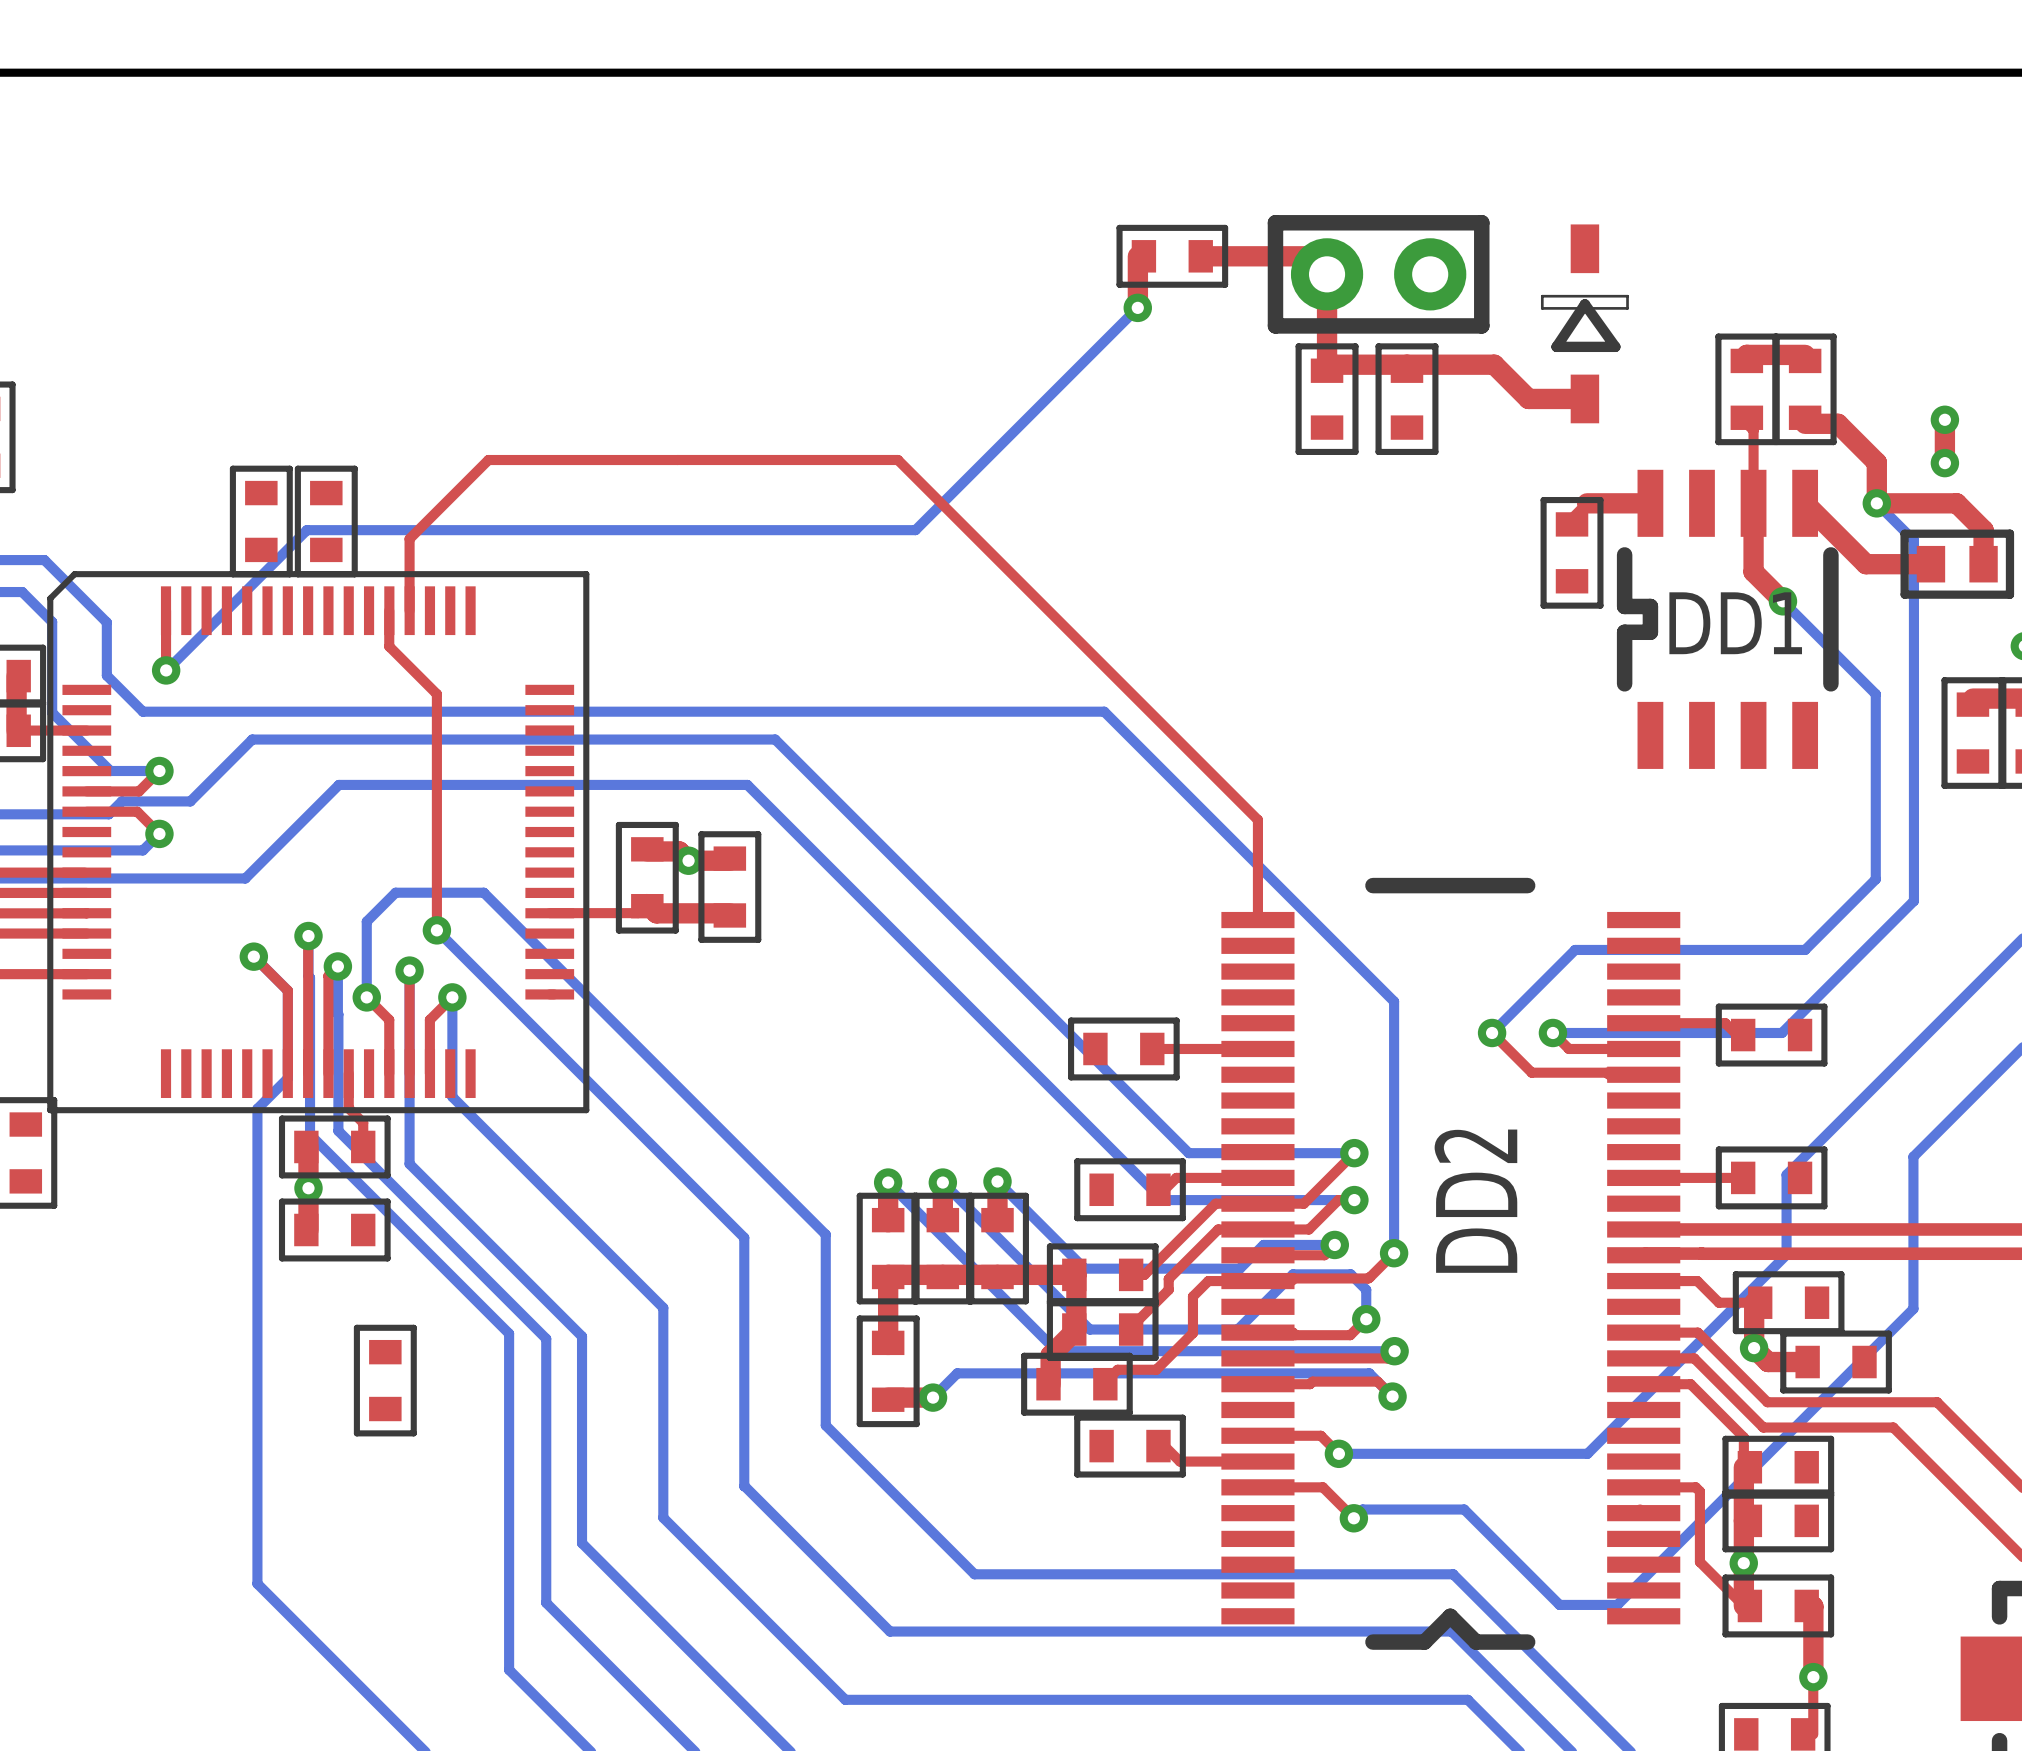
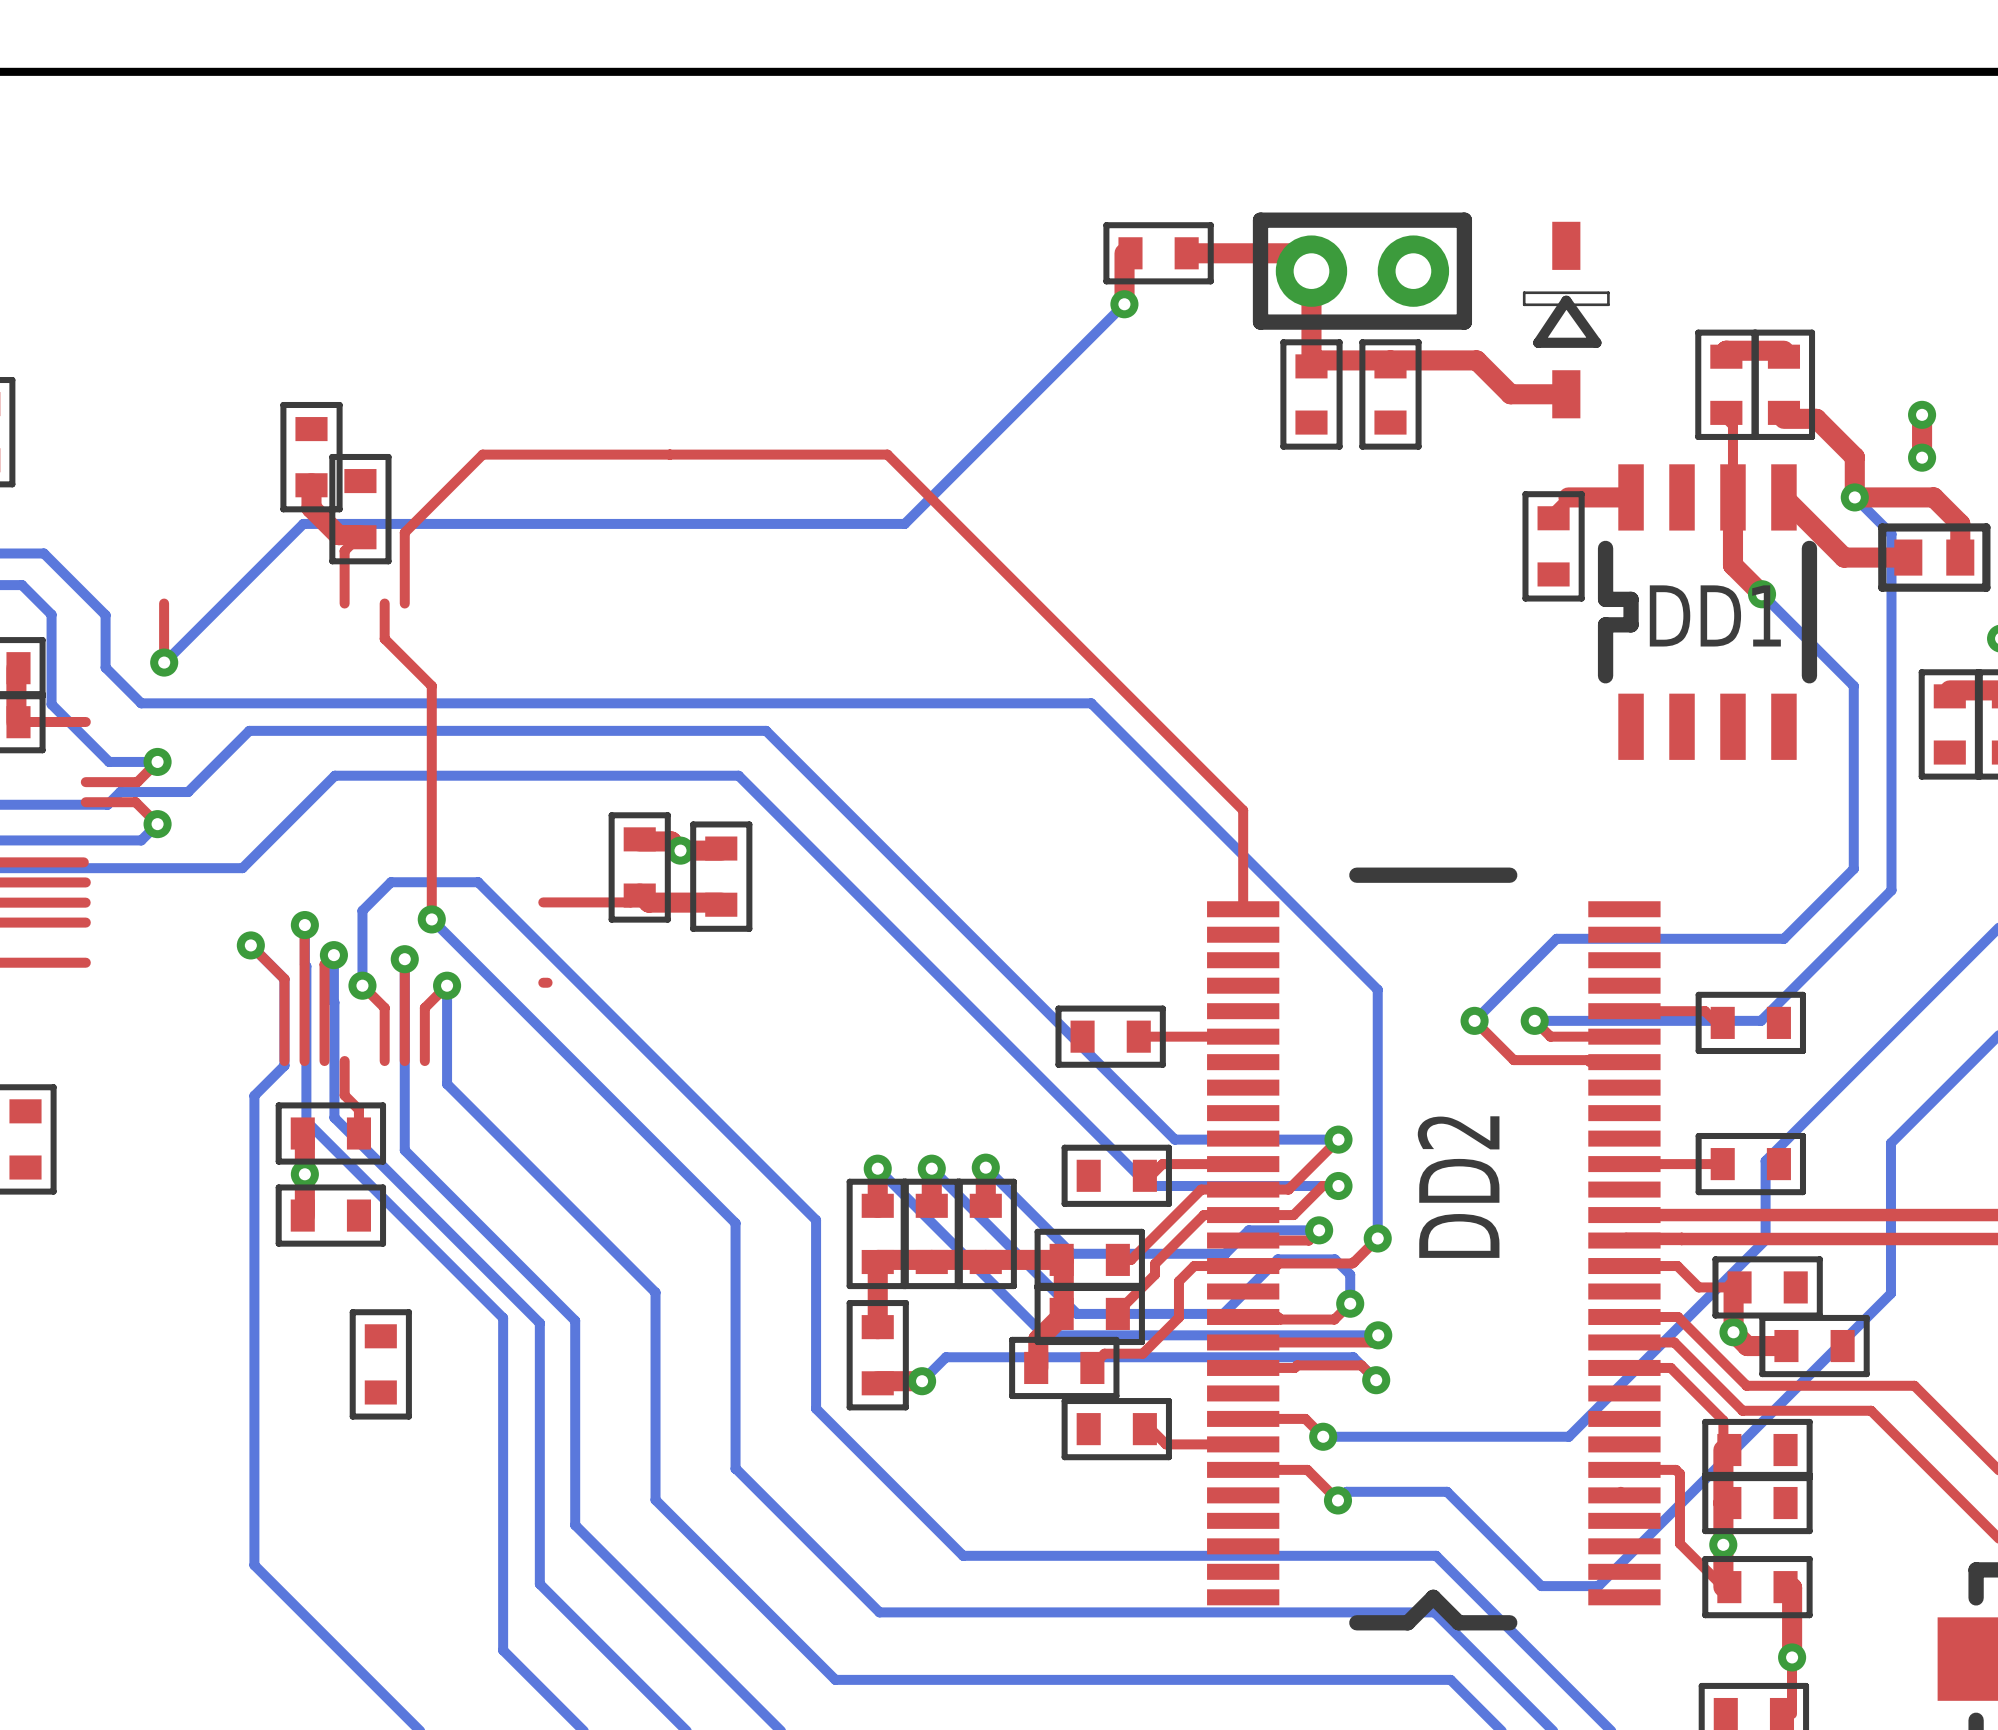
part: none -> (311, 457)
top track: none -> (311, 483) (311, 508) (338, 535) (360, 535) (344, 550) (344, 603)
part: none -> (360, 509)
part: (261, 521) -> none
part: (326, 521) -> none
part: (318, 842) -> none

